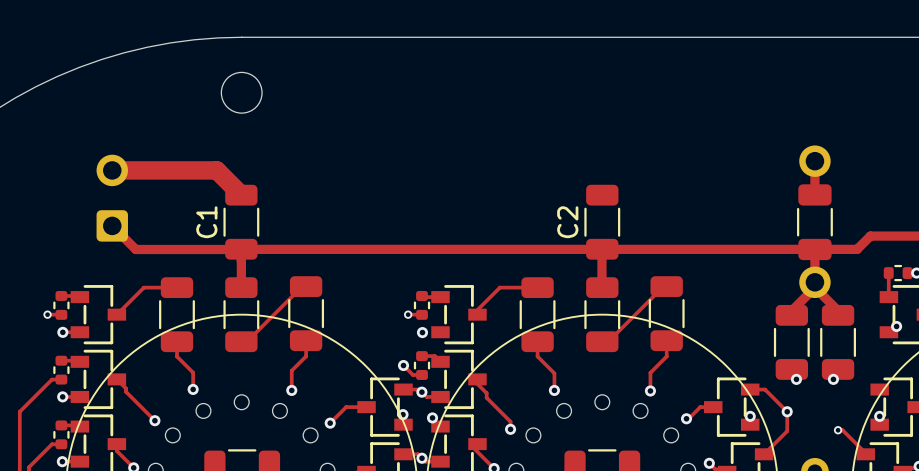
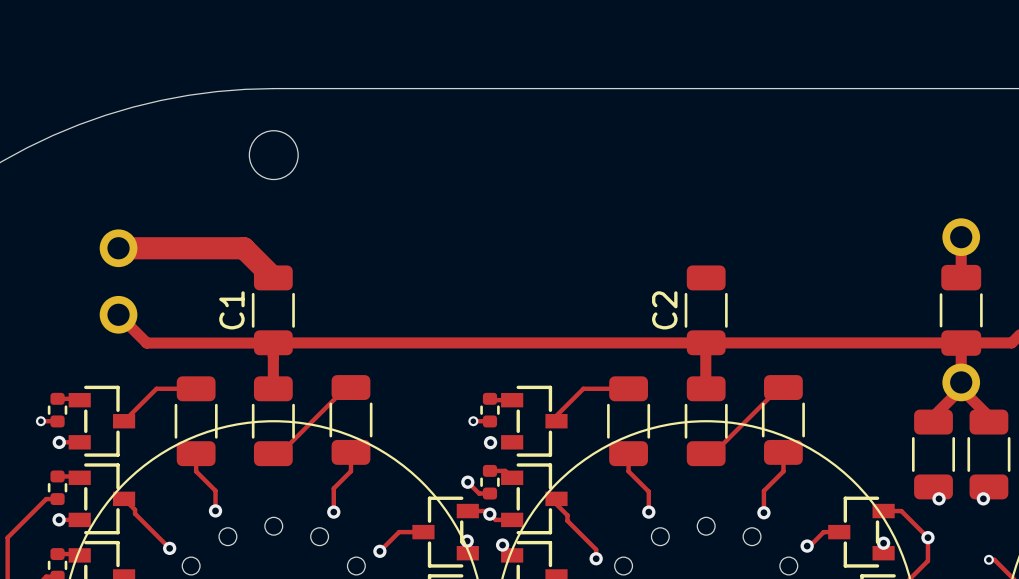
part footprint: [96, 210, 128, 242] -> [99, 295, 138, 334]

